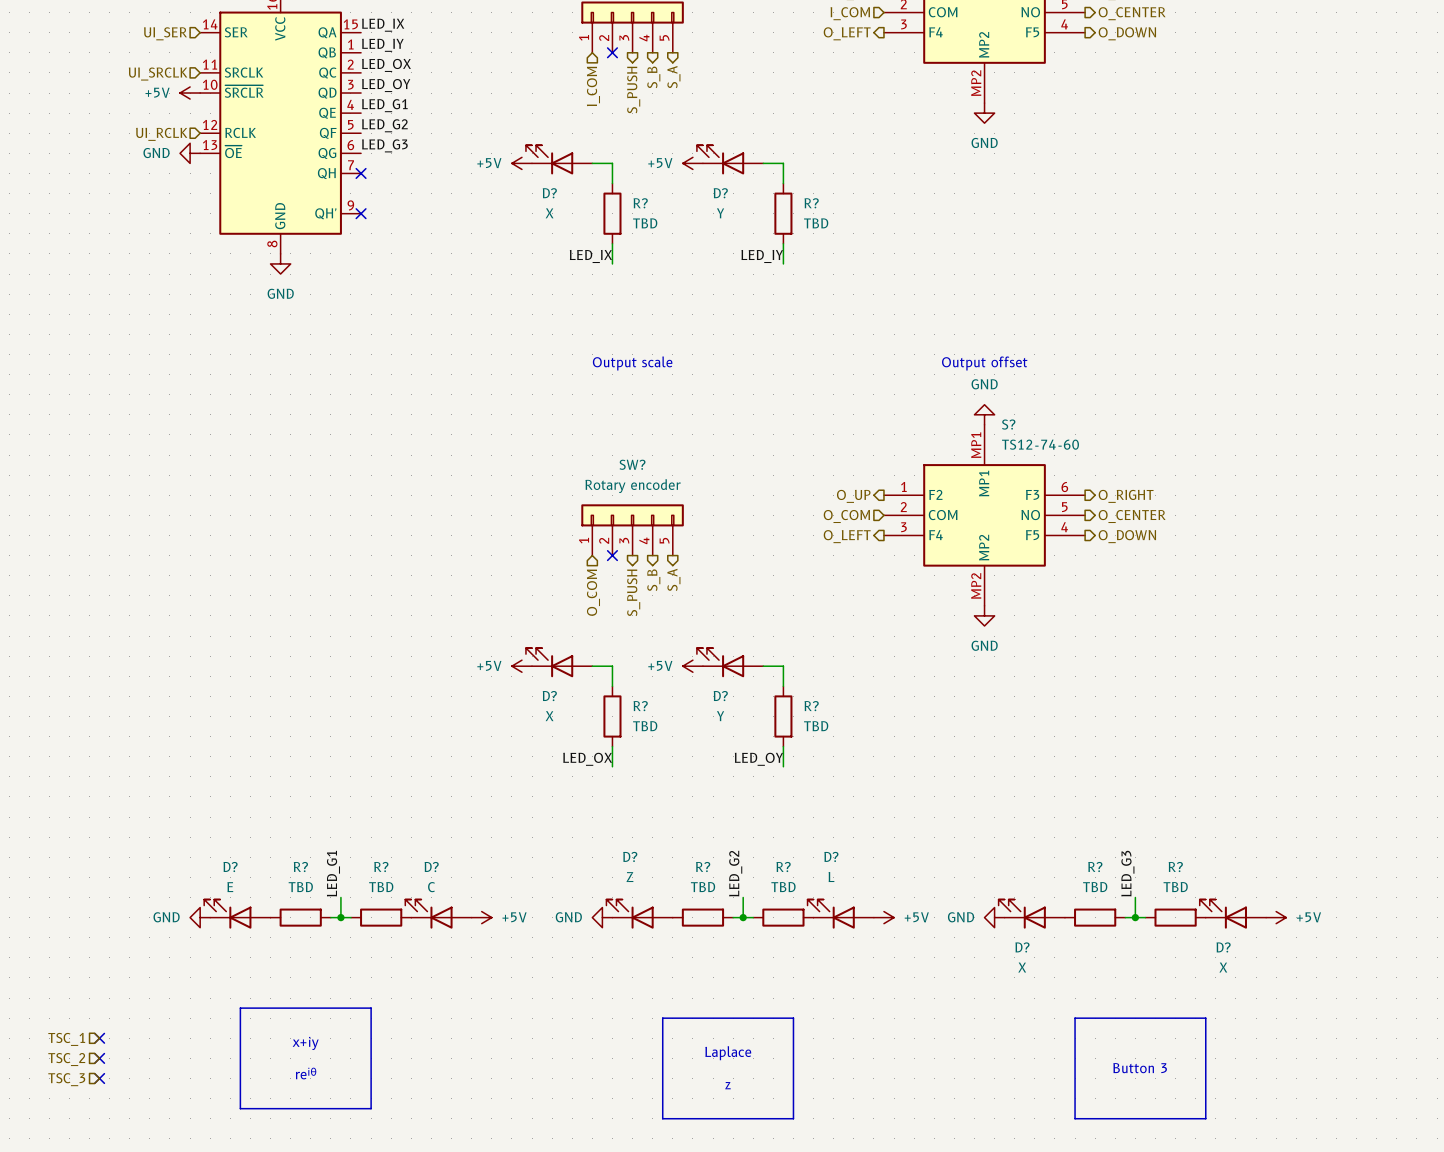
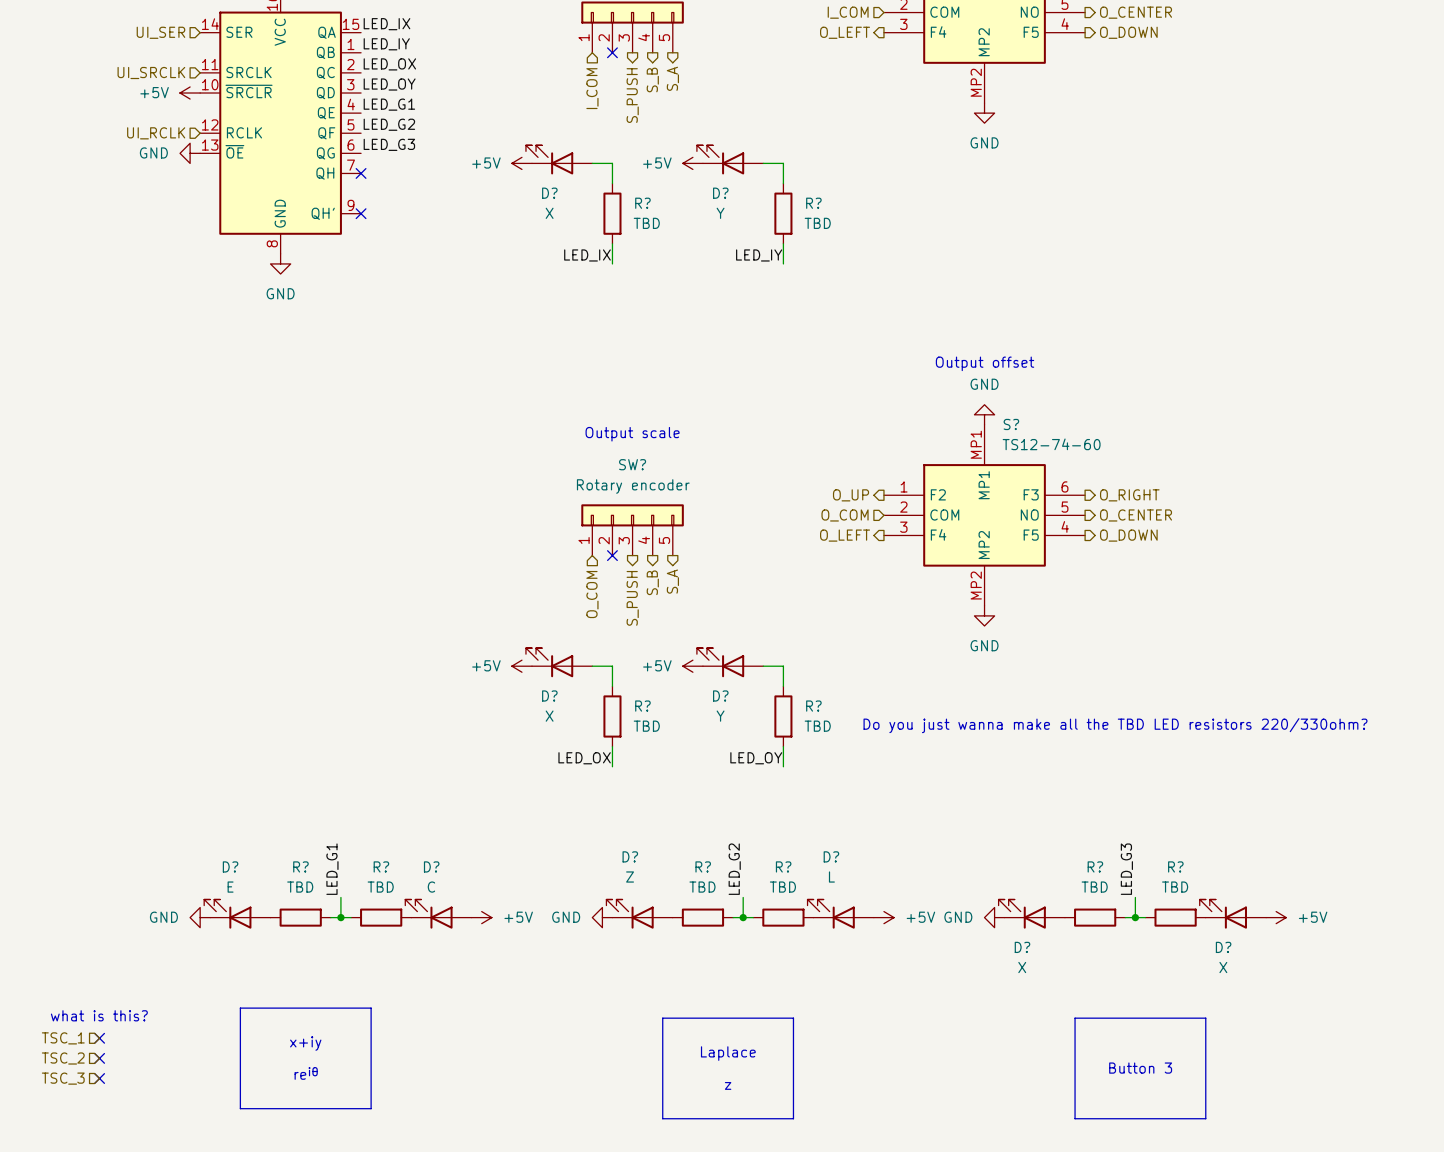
text position: Output scale (632, 363) -> Output scale (632, 434)
text: none -> Do you just wanna make all the TBD LED resistors 220/330ohm? (1115, 725)
text: none -> what is this? (99, 1015)

